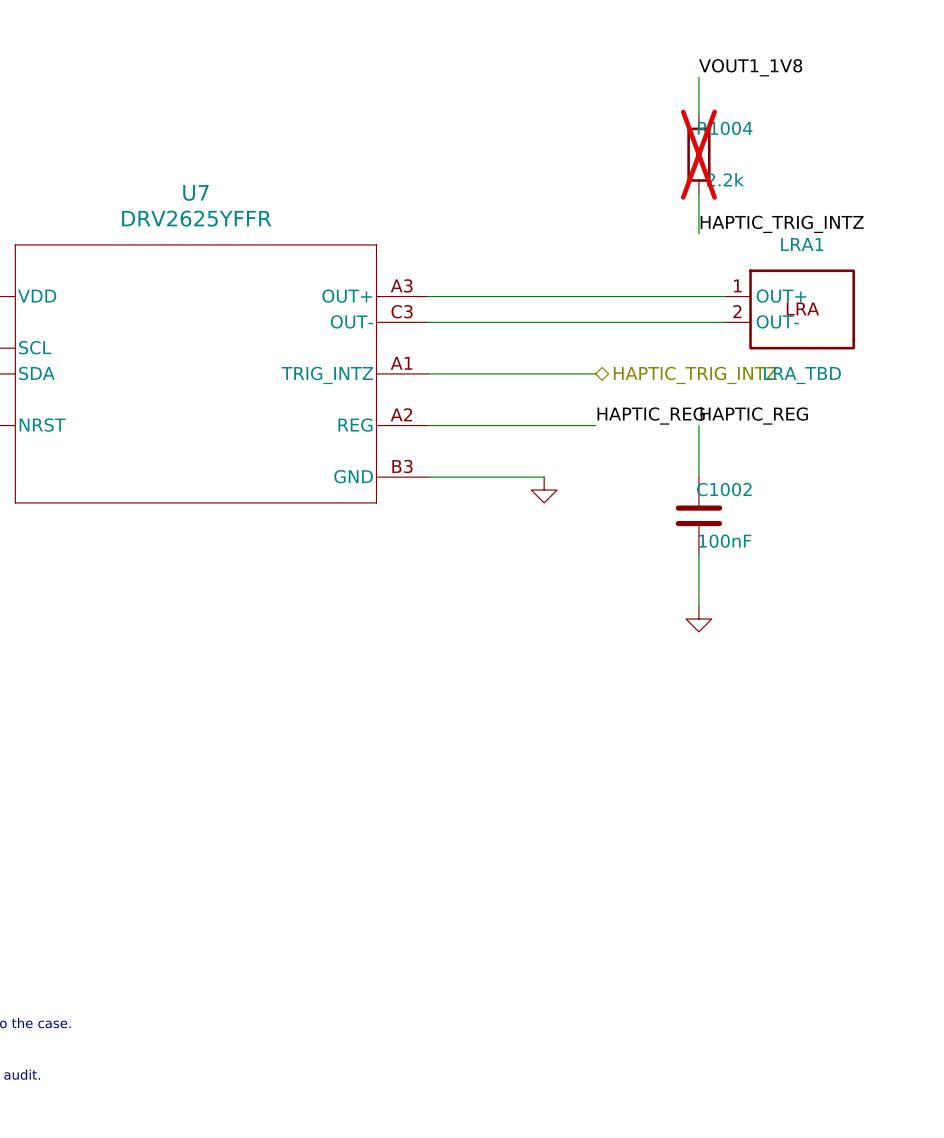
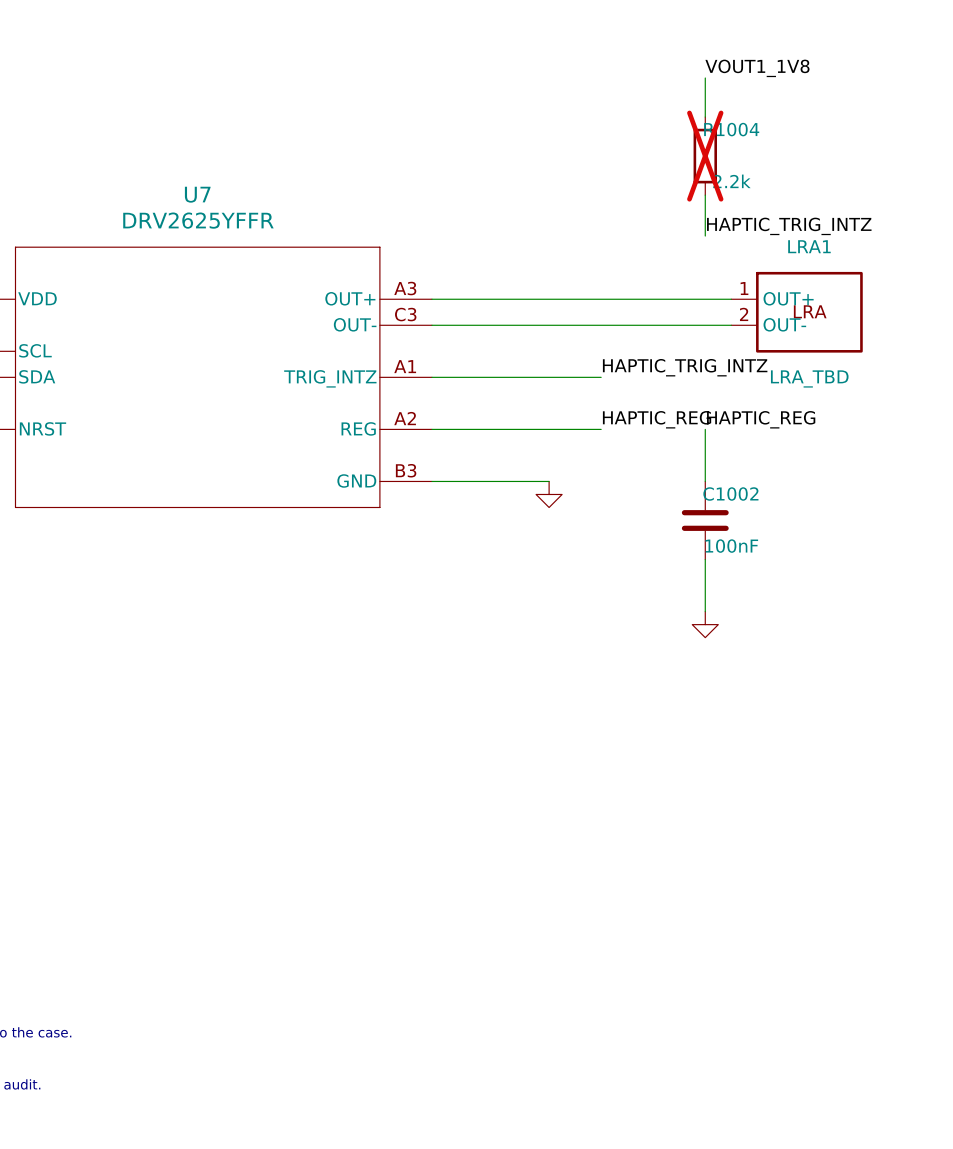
label: none -> HAPTIC_TRIG_INTZ (685, 367)
hierarchical label: HAPTIC_TRIG_INTZ (695, 375) -> none

